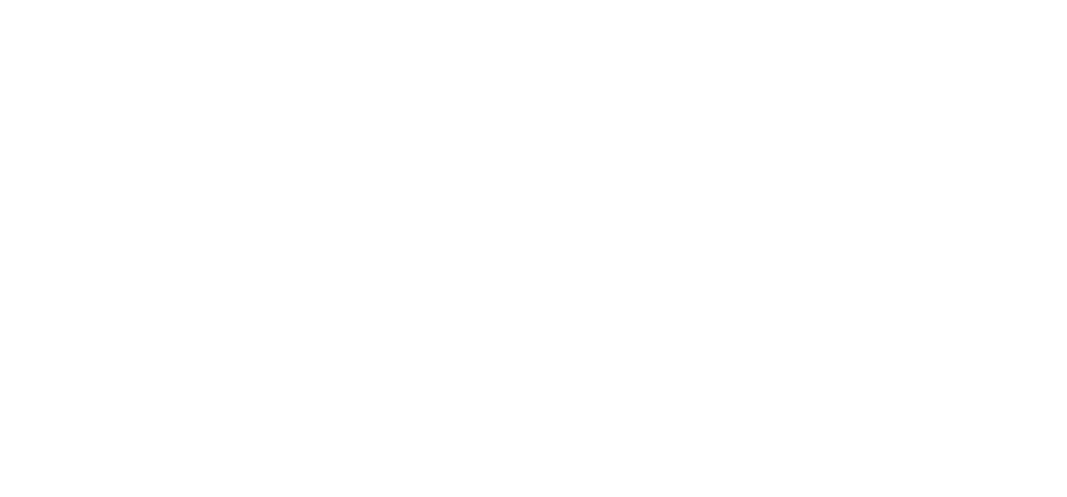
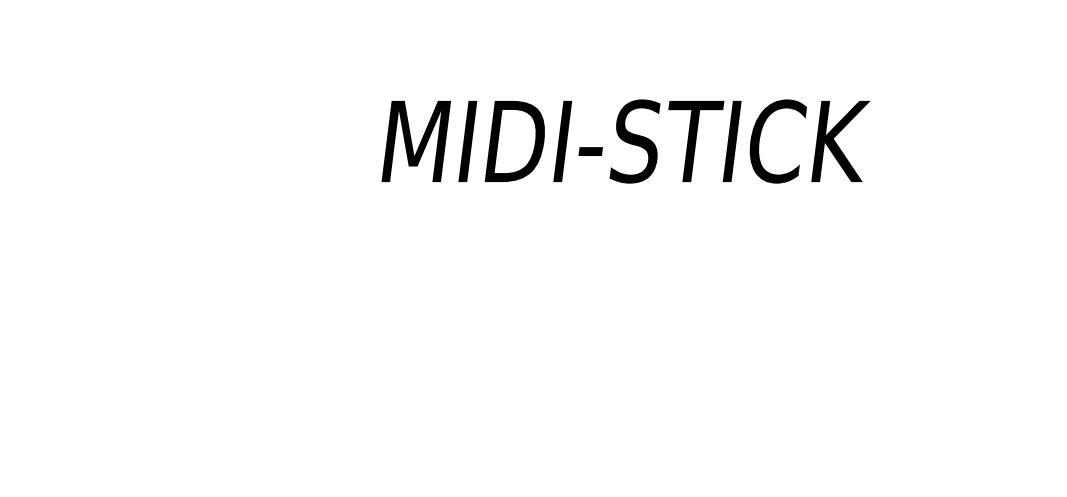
text: none -> MIDI-STICK (626, 141)

